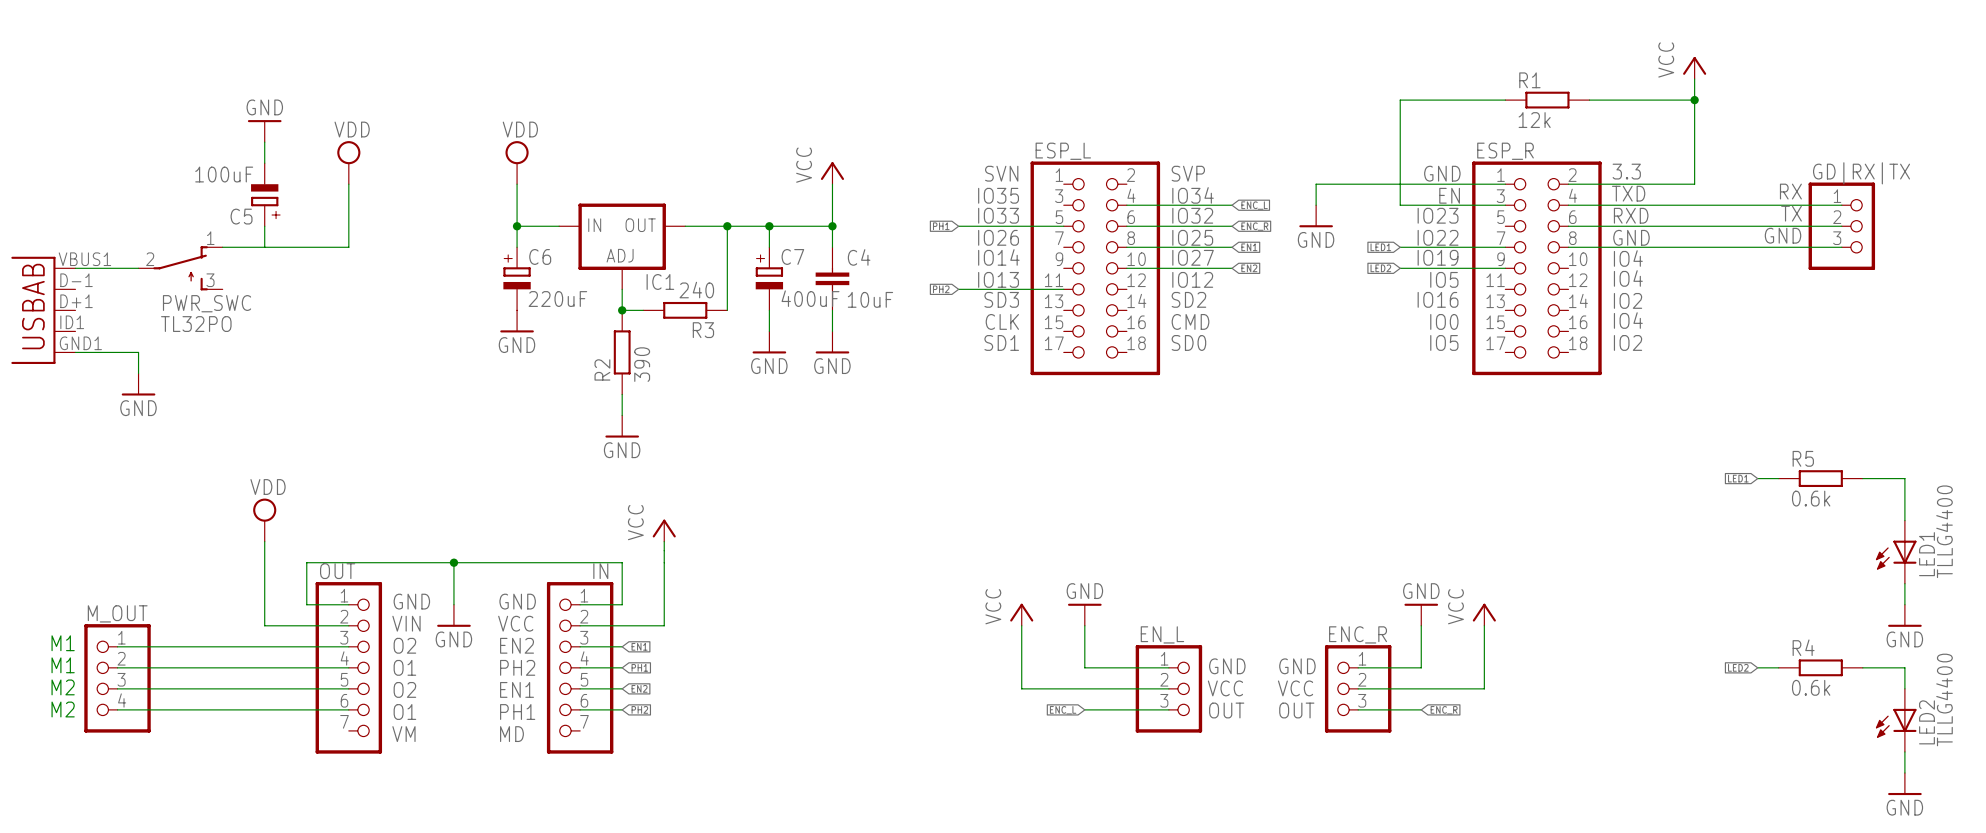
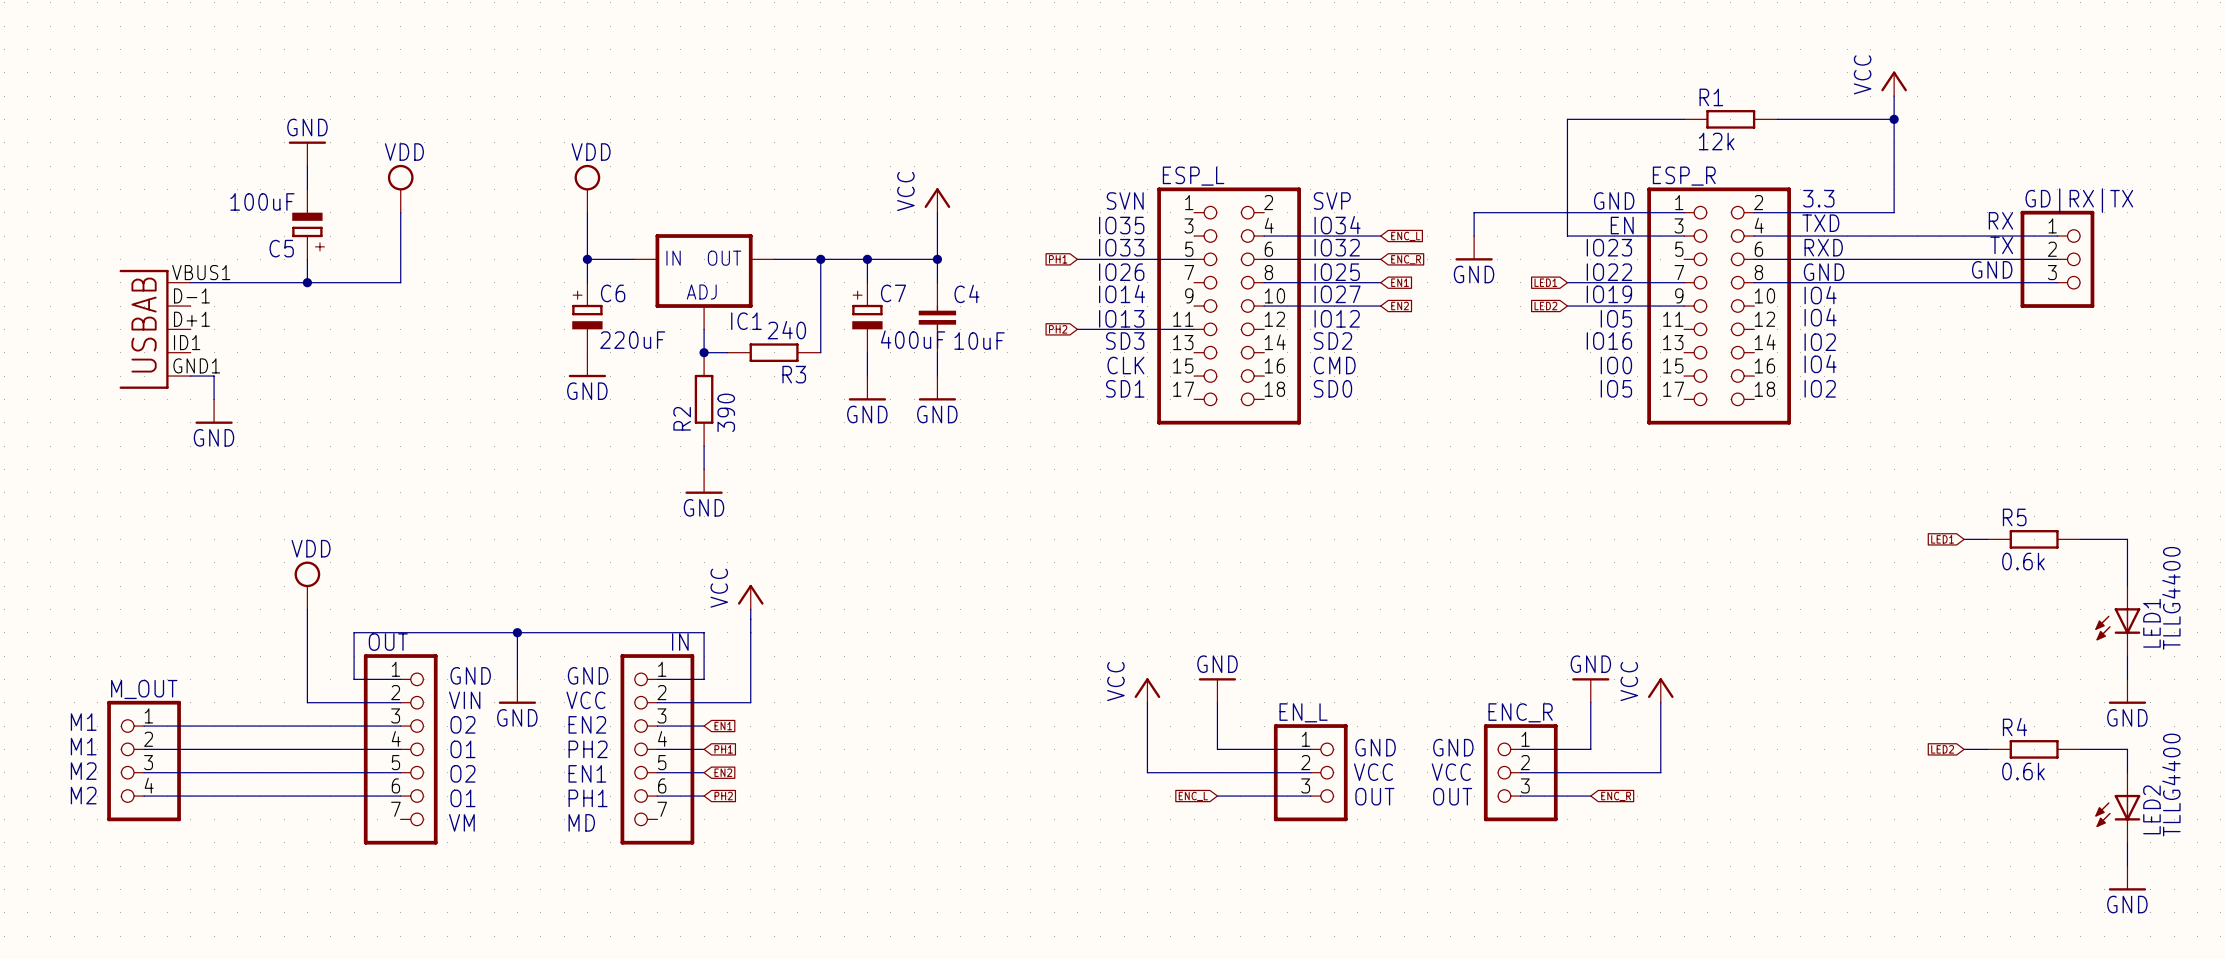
junction: none -> (307, 282)
wire: (75, 268) (138, 268) -> (190, 282) (260, 282)
PWR_SWC: TL32PO (180, 268) -> none
part position: (43, 310) -> (155, 329)
wire: none -> (190, 376) (214, 376) (214, 399)
wire: (75, 352) (138, 352) (138, 373) -> none
power symbol position: GND (138, 384) -> GND (214, 411)

